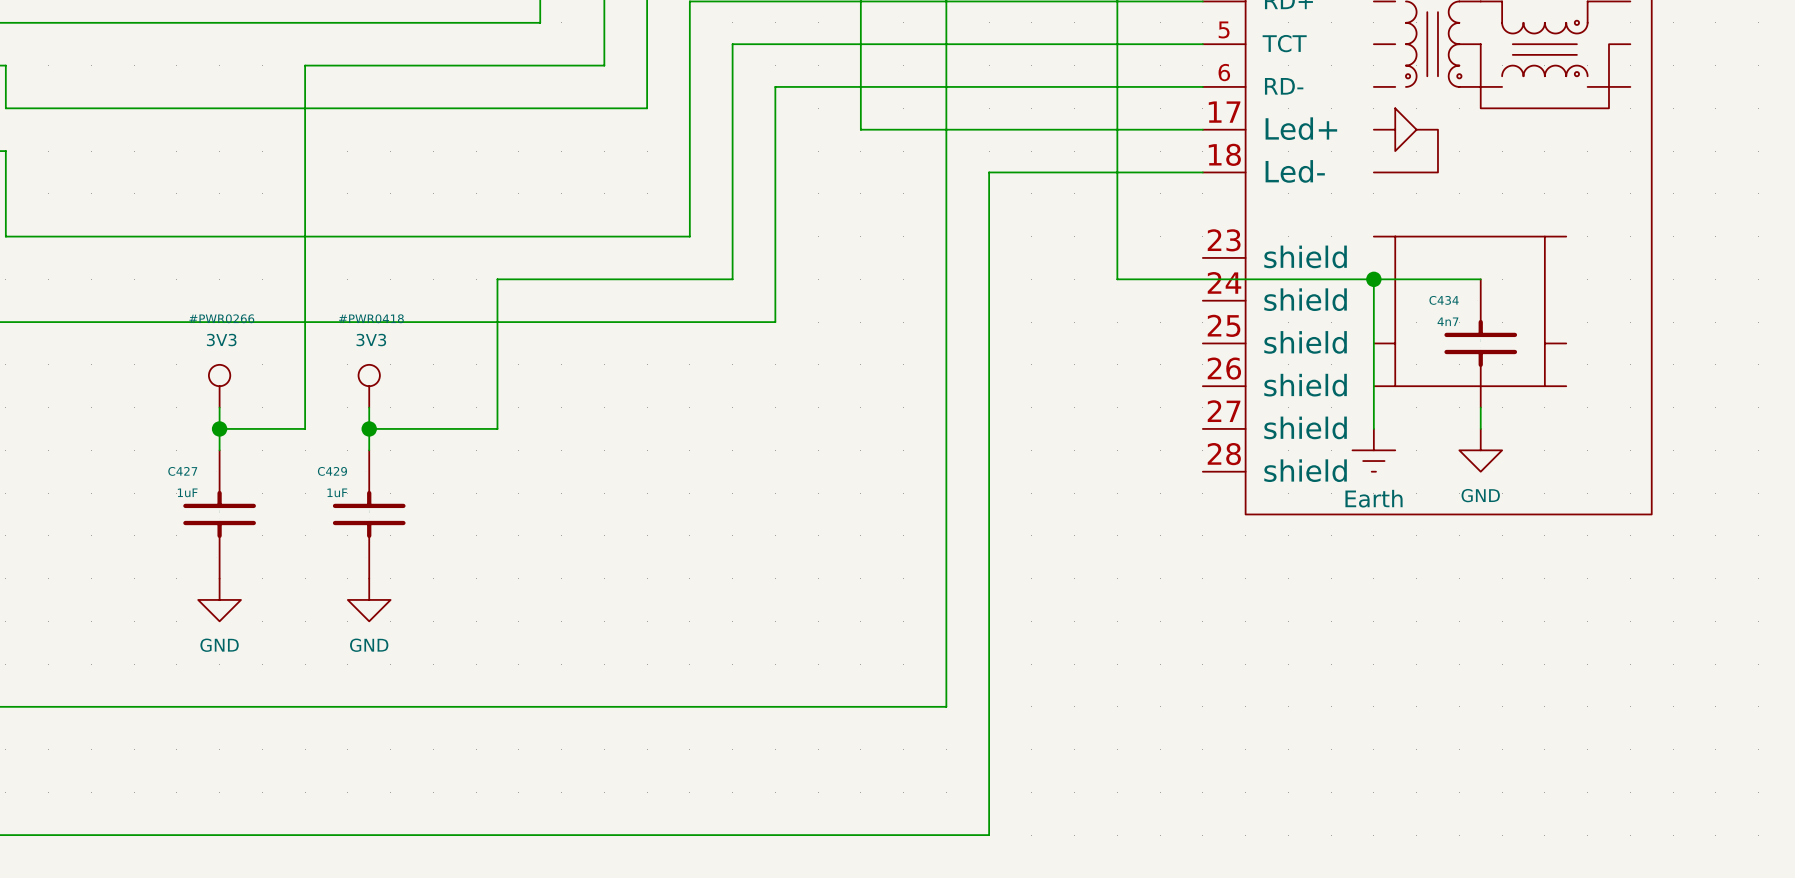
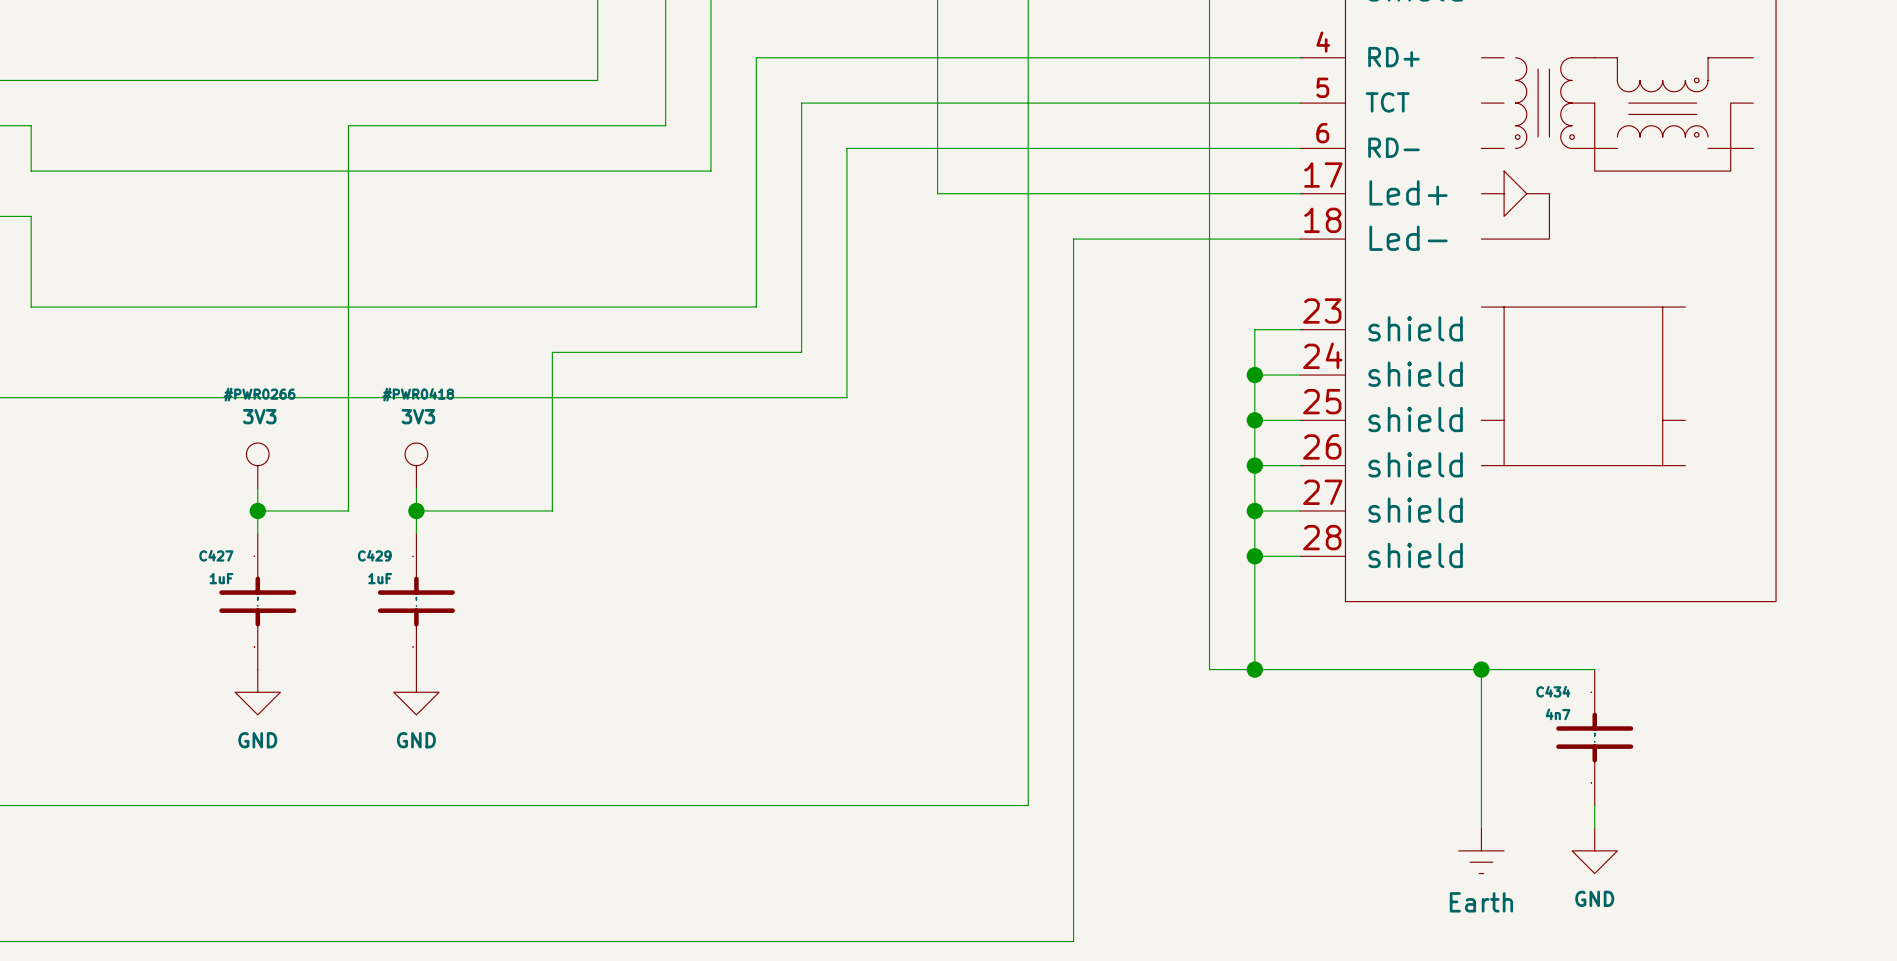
wire: none -> (1300, 329) (1254, 329) (1254, 669)
wire: (1117, 279) (1480, 279) -> (1209, 352) (1209, 669) (1594, 669)
wire: (1373, 279) (1373, 428) -> (1481, 669) (1481, 828)
junction: (1373, 279) -> none
wire: none -> (1254, 375) (1300, 375)
junction: none -> (1254, 375)
wire: none -> (1254, 420) (1300, 420)
junction: none -> (1254, 420)
C434 position: (1480, 343) -> (1594, 737)
wire: none -> (1254, 465) (1300, 465)
junction: none -> (1254, 465)
wire: (1480, 407) (1480, 428) -> (1594, 805) (1594, 828)
wire: none -> (1254, 510) (1300, 510)
junction: none -> (1254, 510)
power symbol position: Earth (1373, 450) -> Earth (1481, 850)
power symbol position: GND (1480, 450) -> GND (1594, 850)
wire: none -> (1254, 556) (1300, 556)
junction: none -> (1254, 556)
junction: none -> (1254, 669)
junction: none -> (1481, 669)

